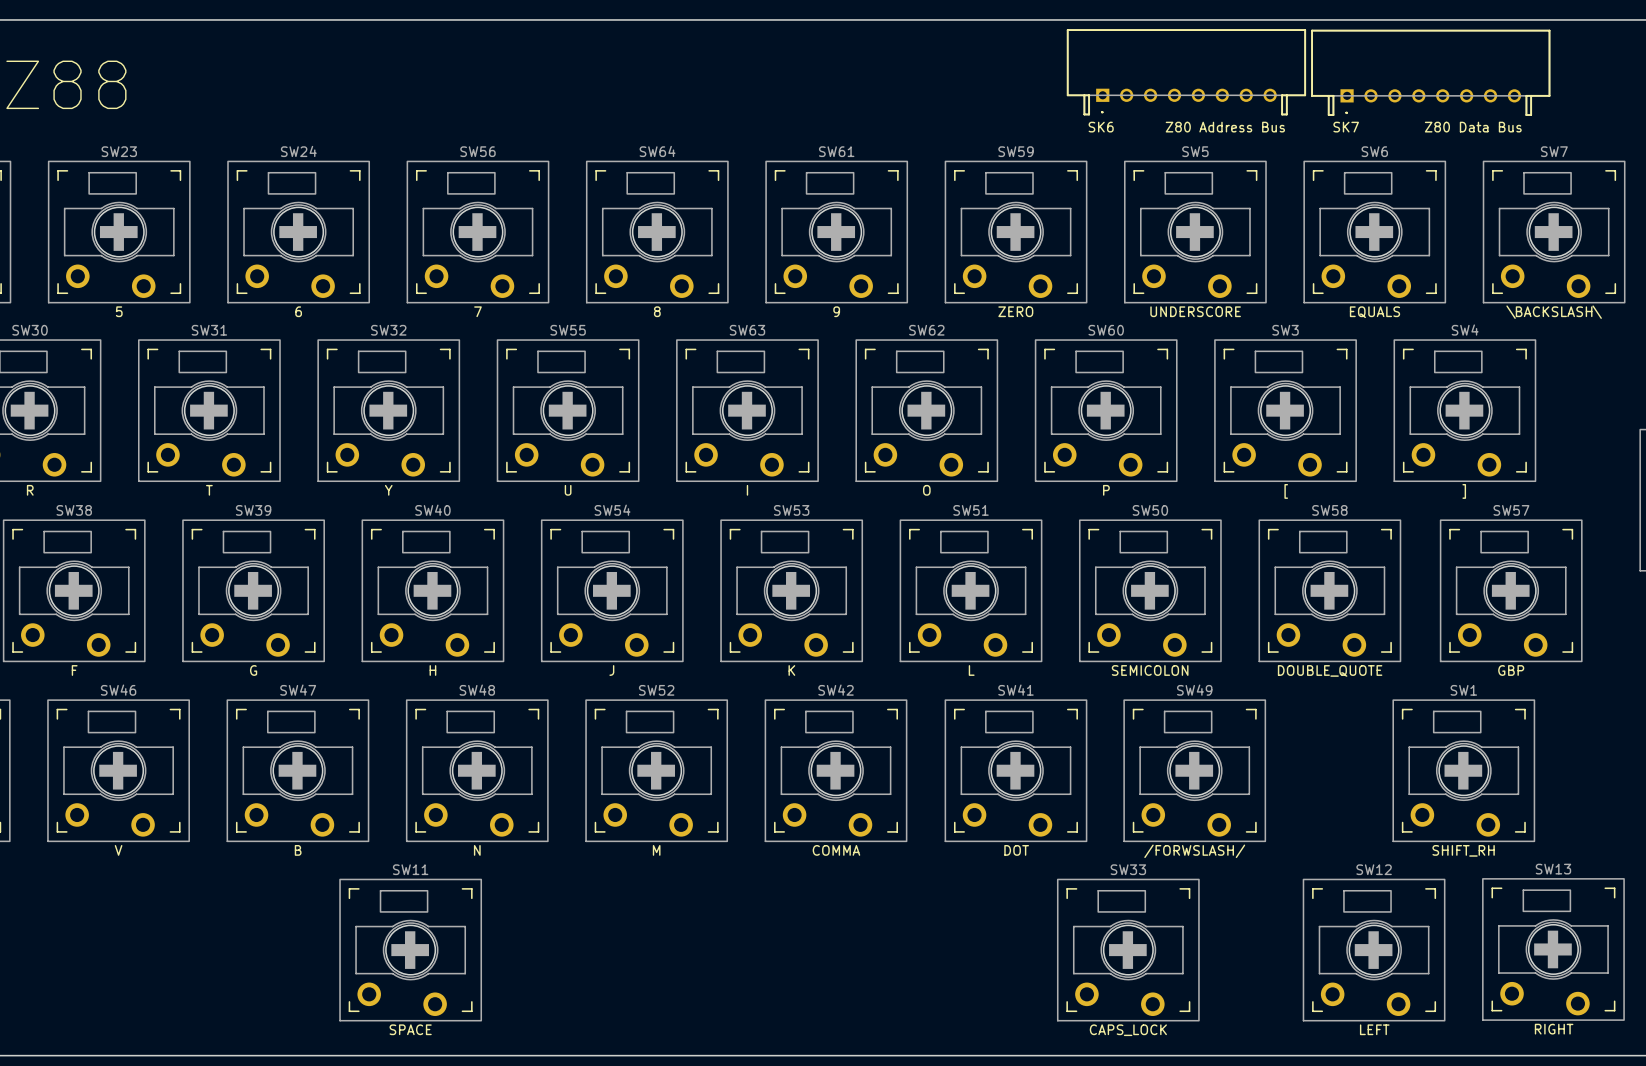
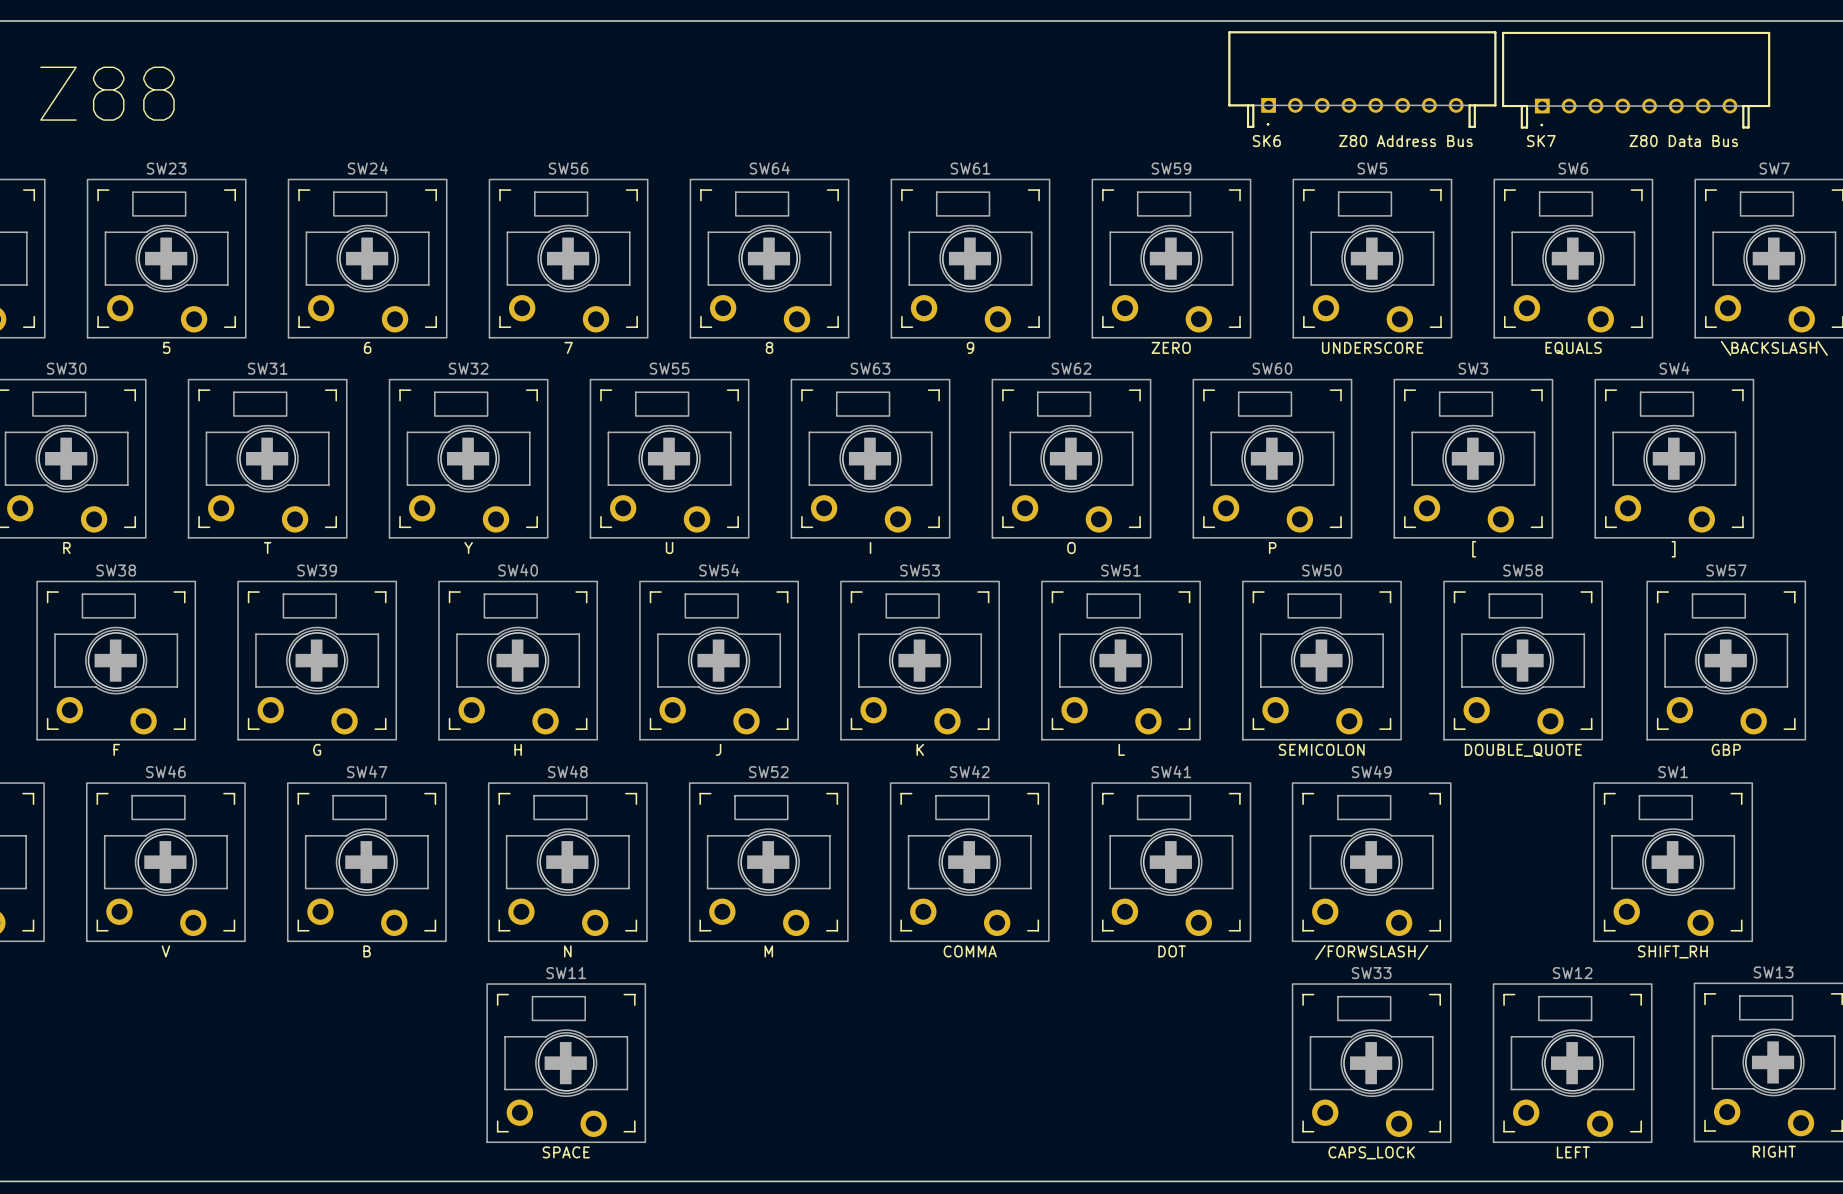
SW11 position: (410, 950) -> (566, 1063)
SW33 position: (1128, 950) -> (1371, 1063)

